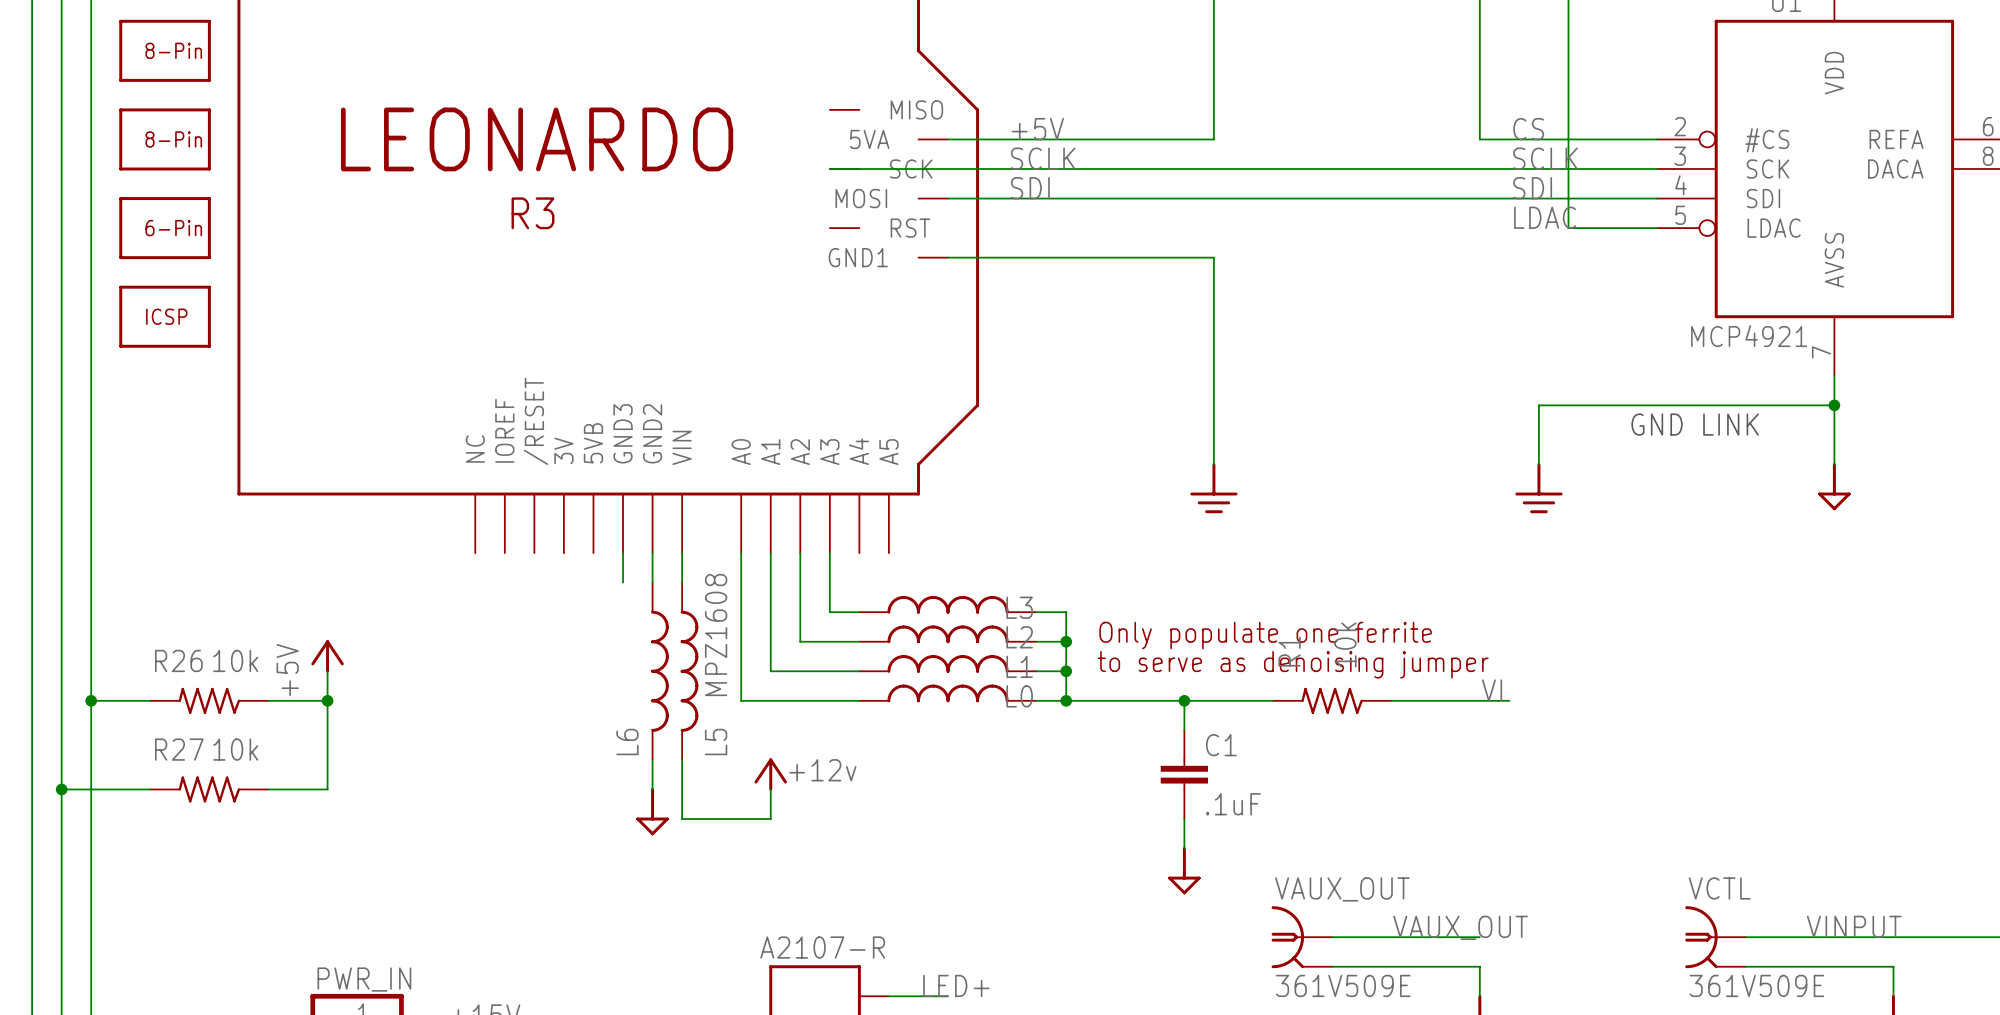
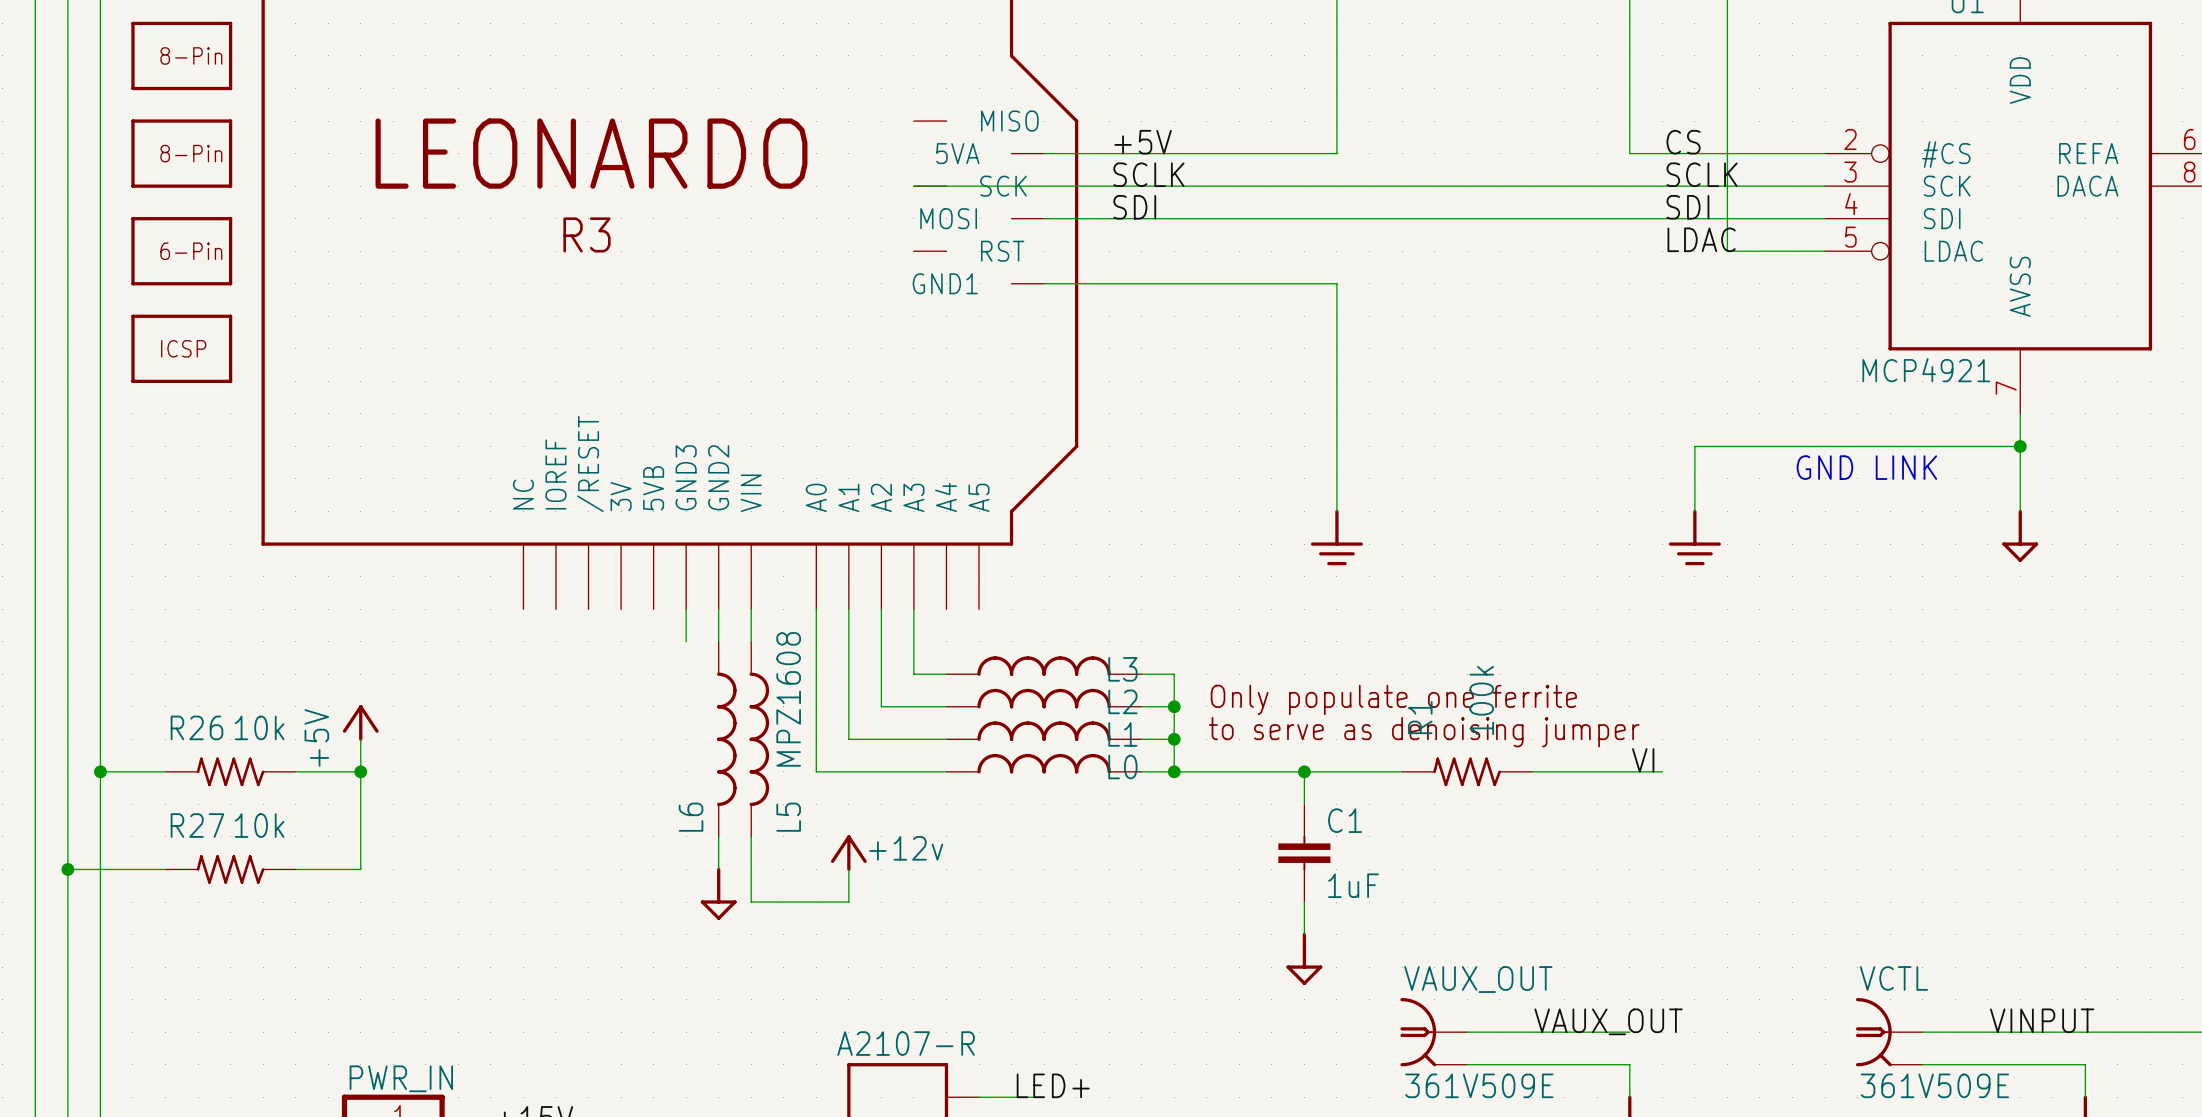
R1 value: 10k (1345, 644) -> 100k (1481, 700)
C1 value: .1uF (1233, 804) -> 1uF (1353, 885)

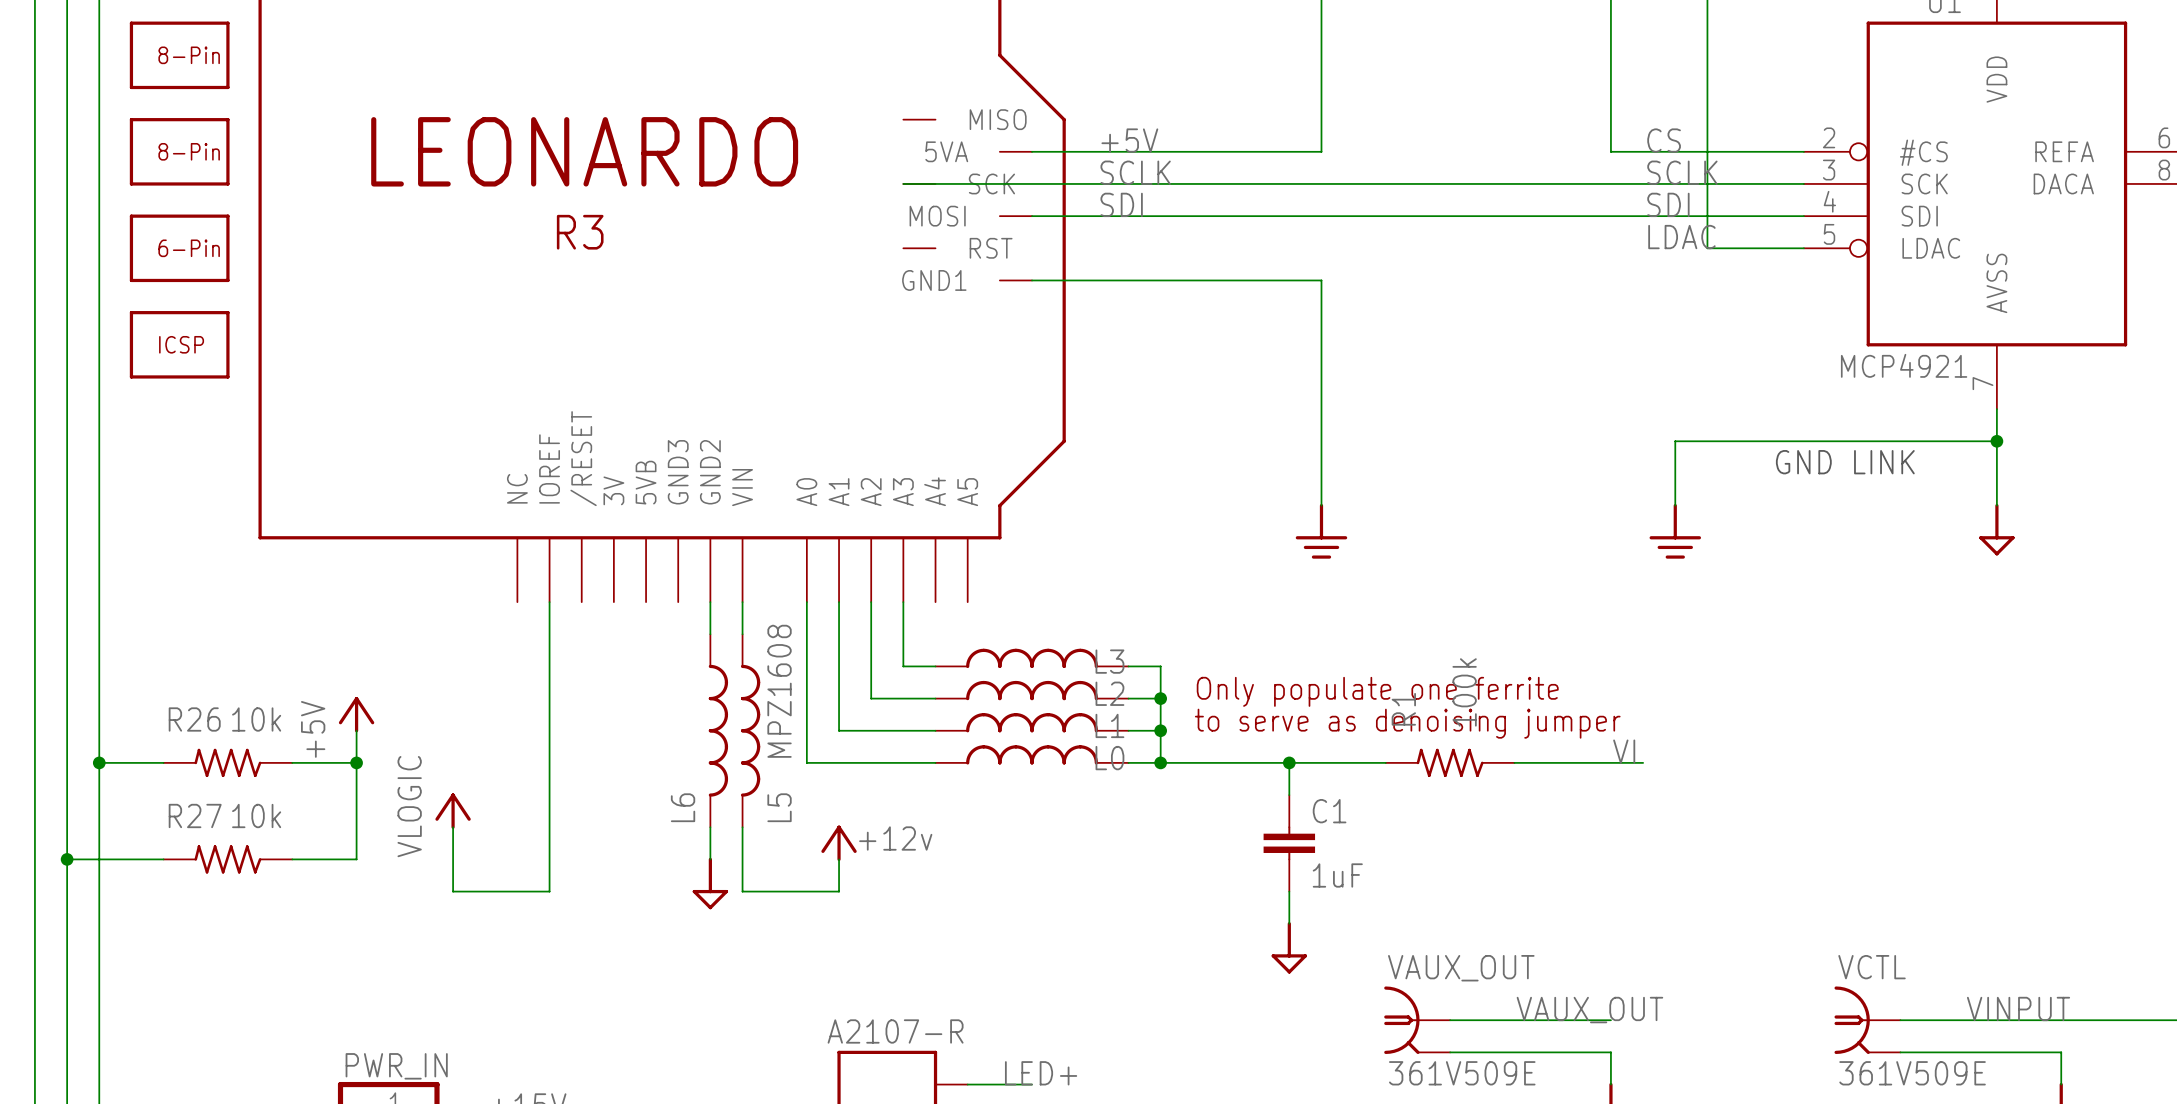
wire: none -> (549, 602) (549, 891) (453, 891) (453, 827)
wire: (686, 609) (686, 641) -> none
part: none -> VLOGIC (453, 811)

